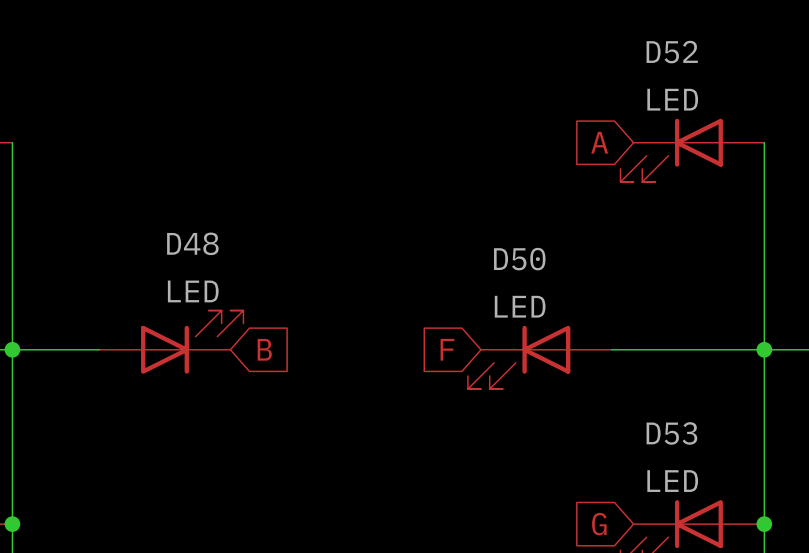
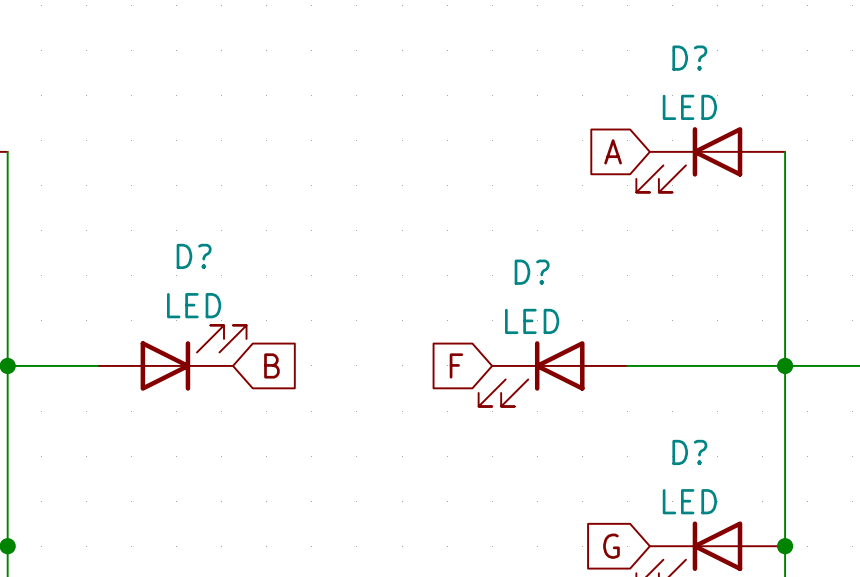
D52 name: D52 (672, 52) -> D? (689, 58)
D48 name: D48 (192, 243) -> D? (194, 256)
D50 name: D50 (519, 259) -> D? (532, 272)
D53 name: D53 (671, 433) -> D? (689, 452)

